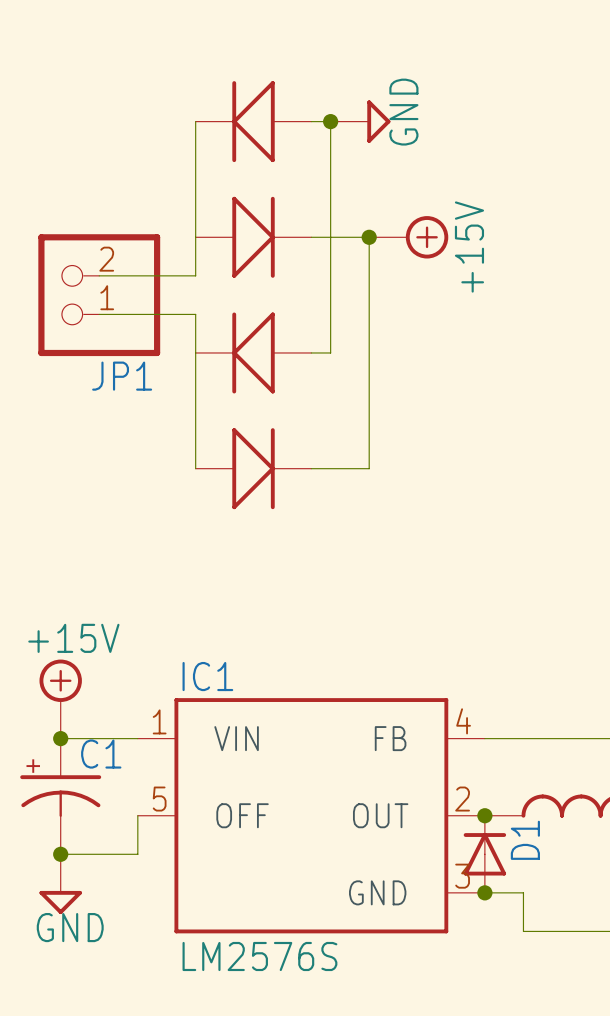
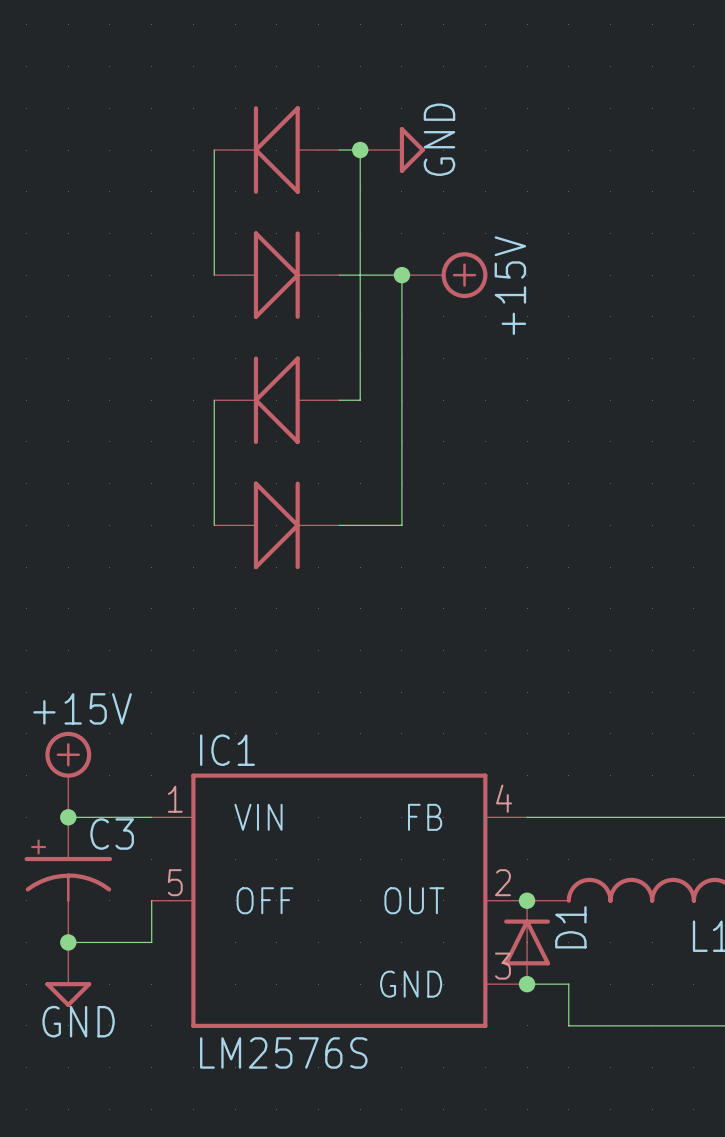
wire: (195, 237) (195, 275) (99, 275) -> none
JP1: (99, 295) -> none
wire: (99, 314) (195, 314) (195, 352) -> none
C1 name: C1 (101, 754) -> C3 (112, 834)

